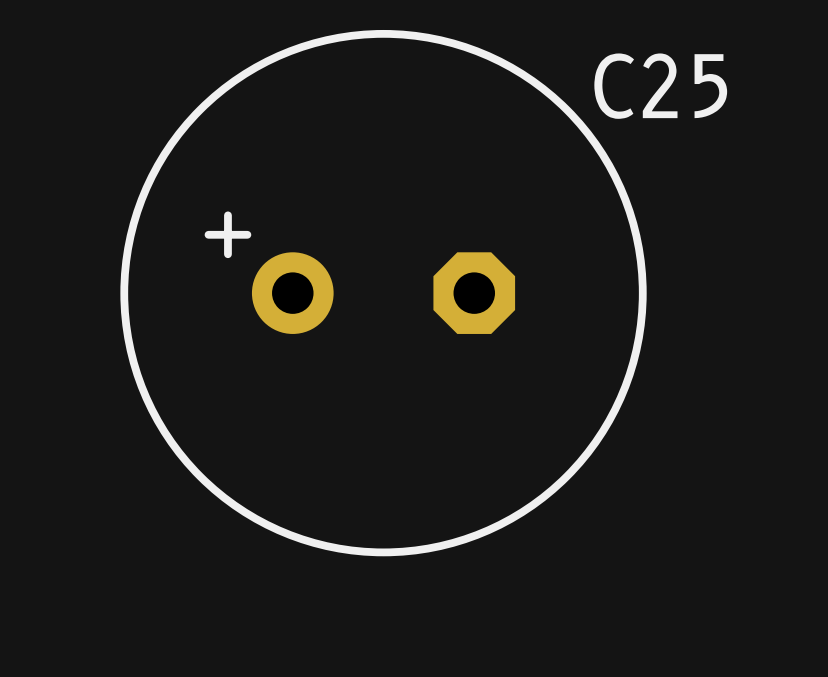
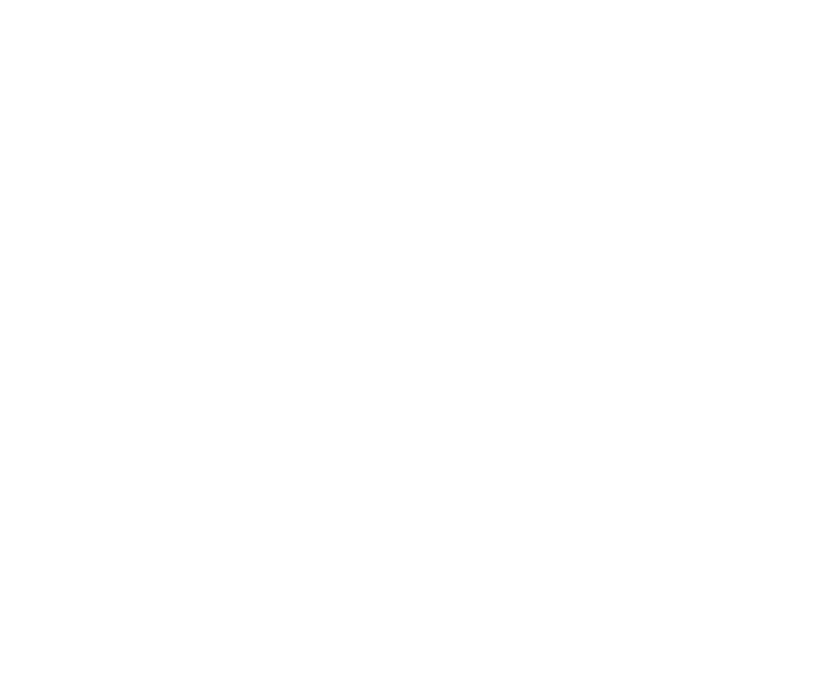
C25: (383, 293) -> none

